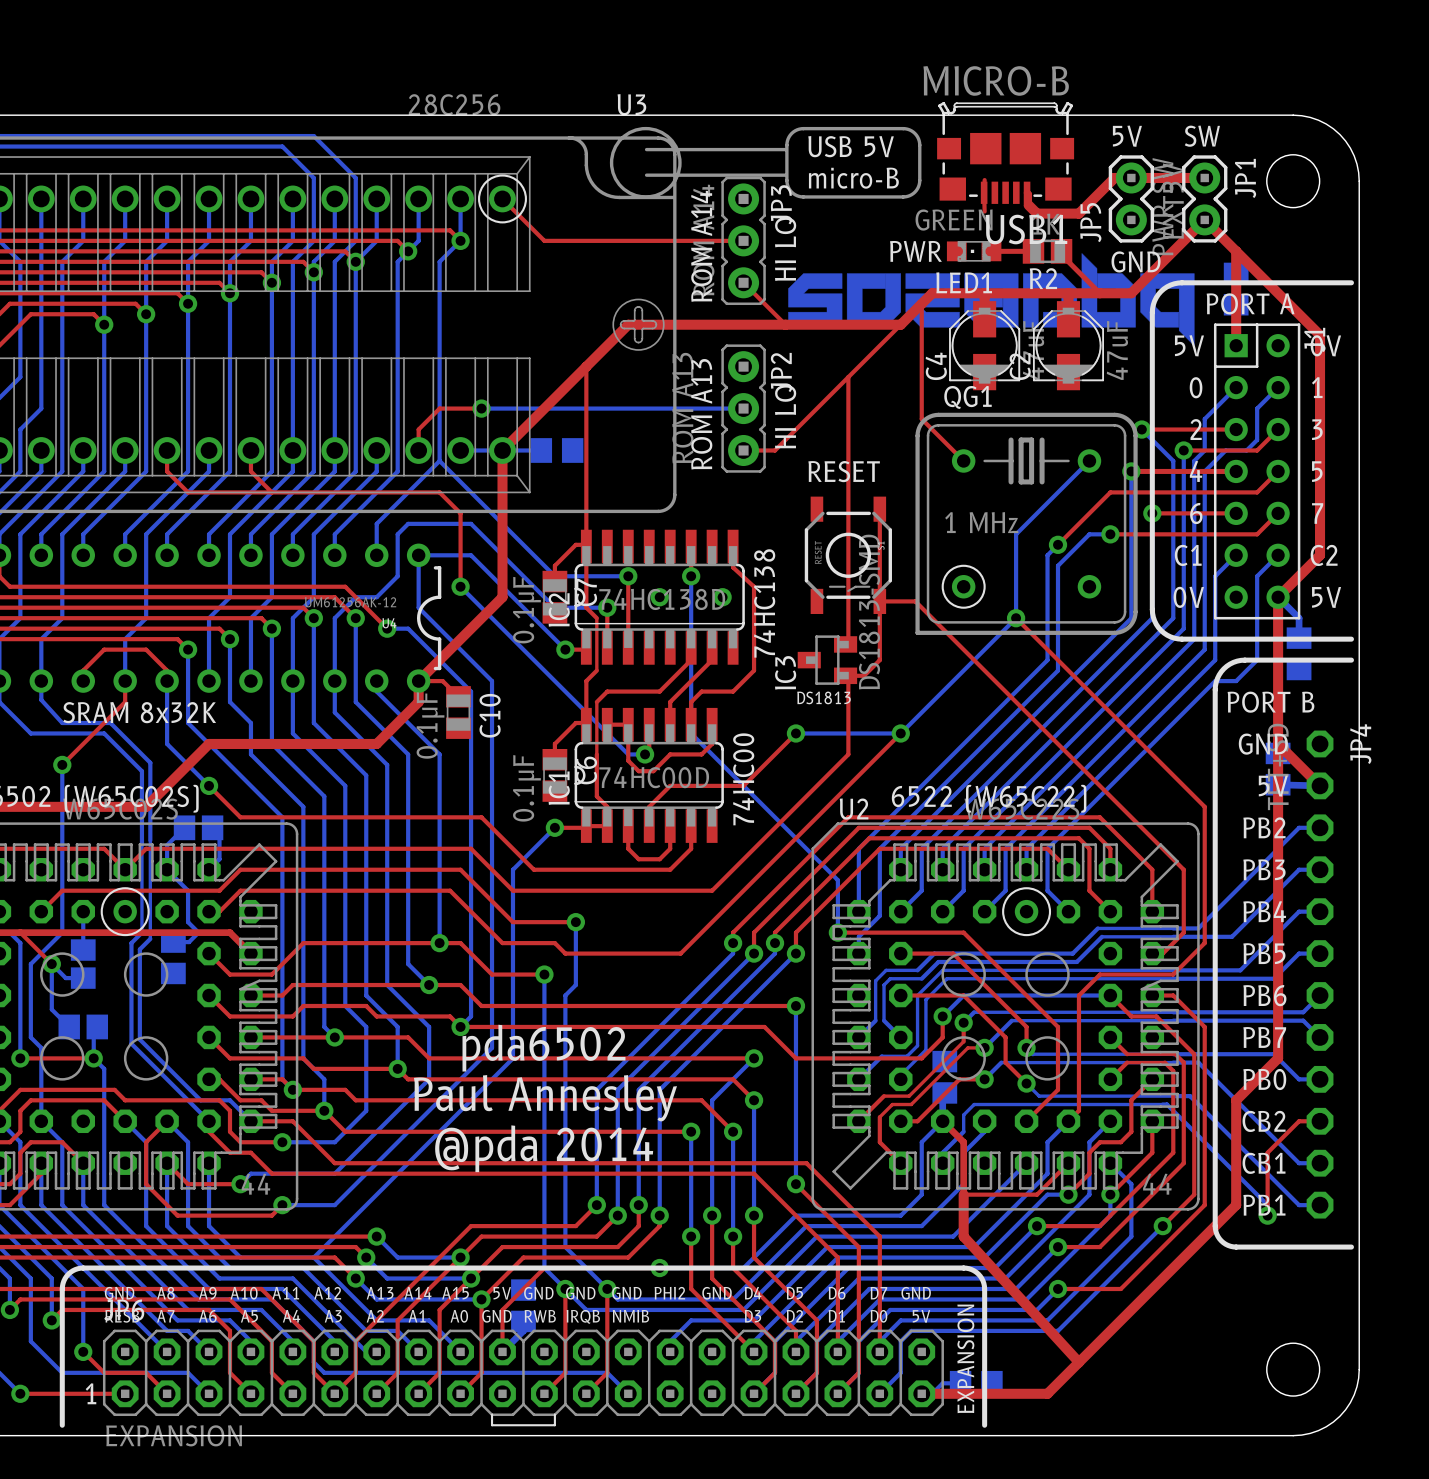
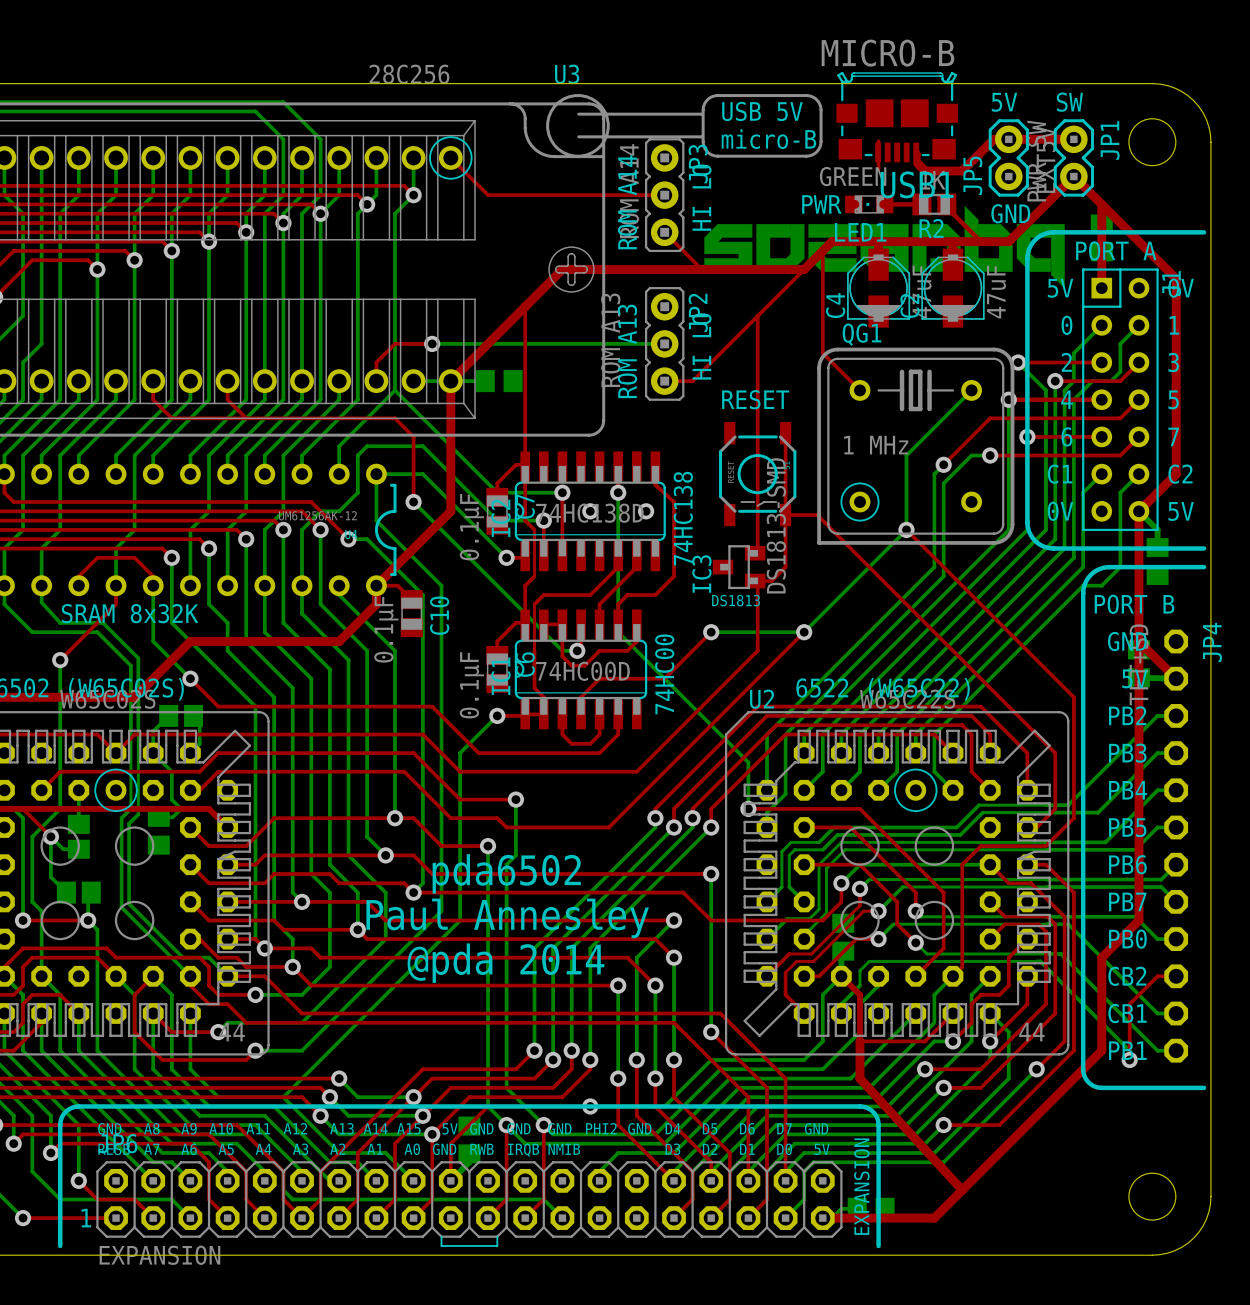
text position: pda6502 (543, 1048) -> pda6502 (506, 873)
text position: Paul Annesley (545, 1098) -> Paul Annesley (507, 918)
text position: @pda 2014 (544, 1148) -> @pda 2014 (505, 963)

